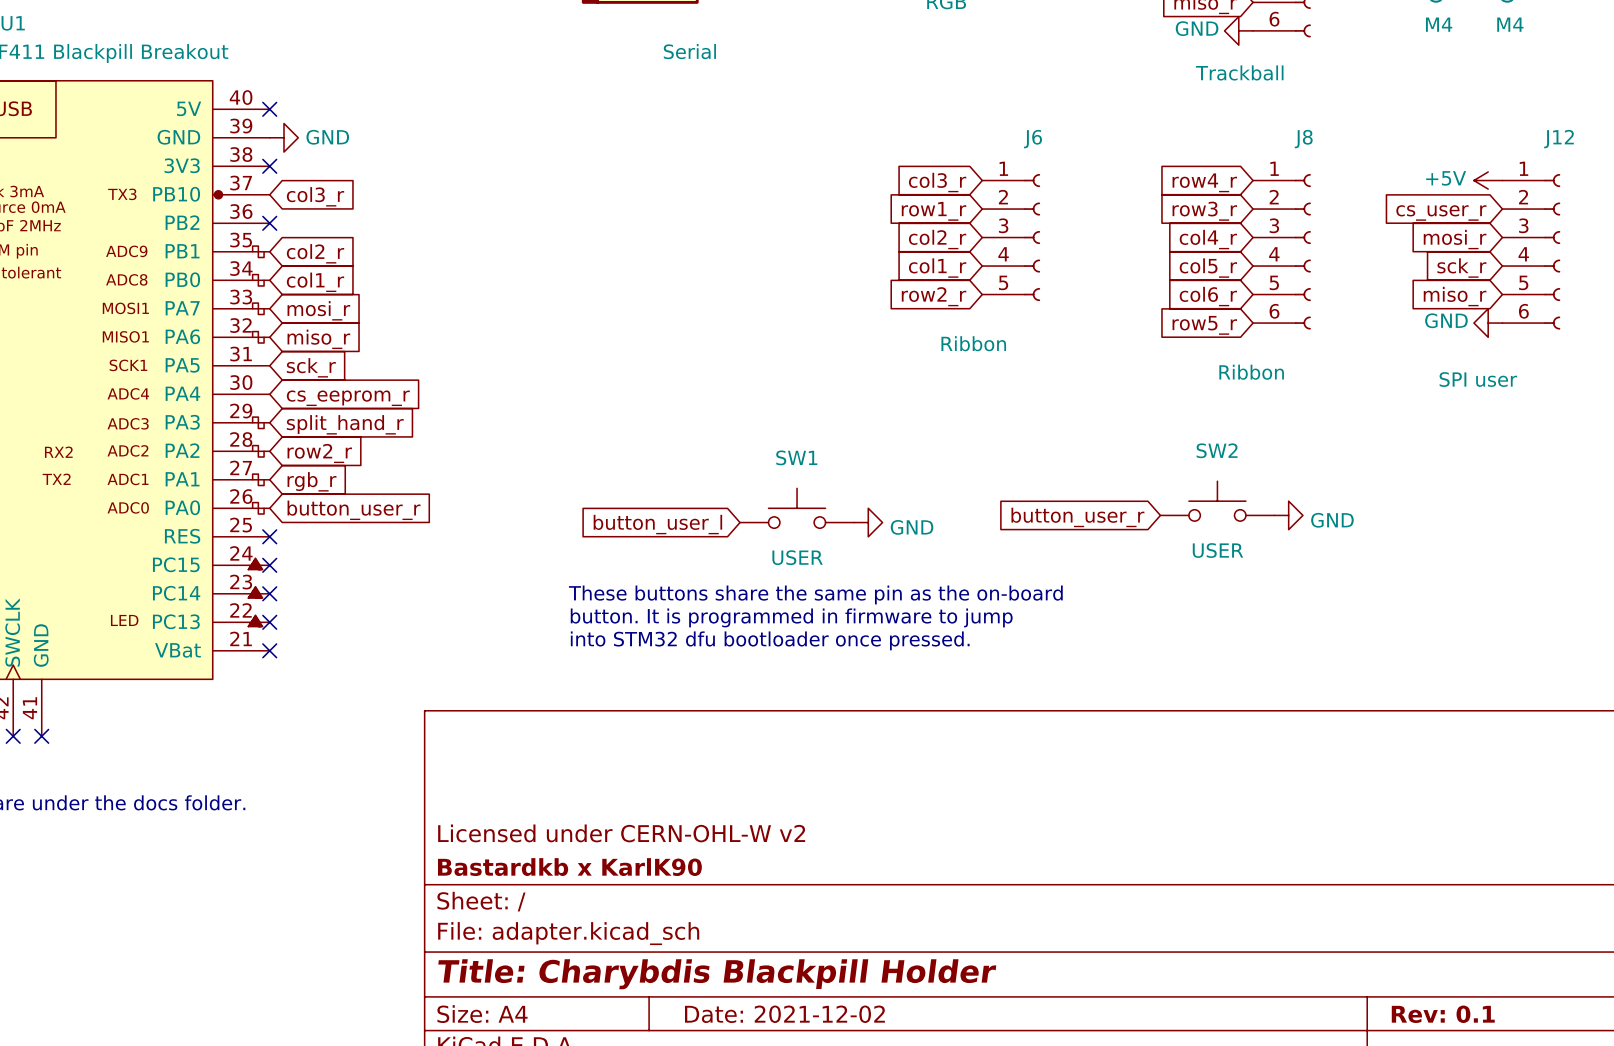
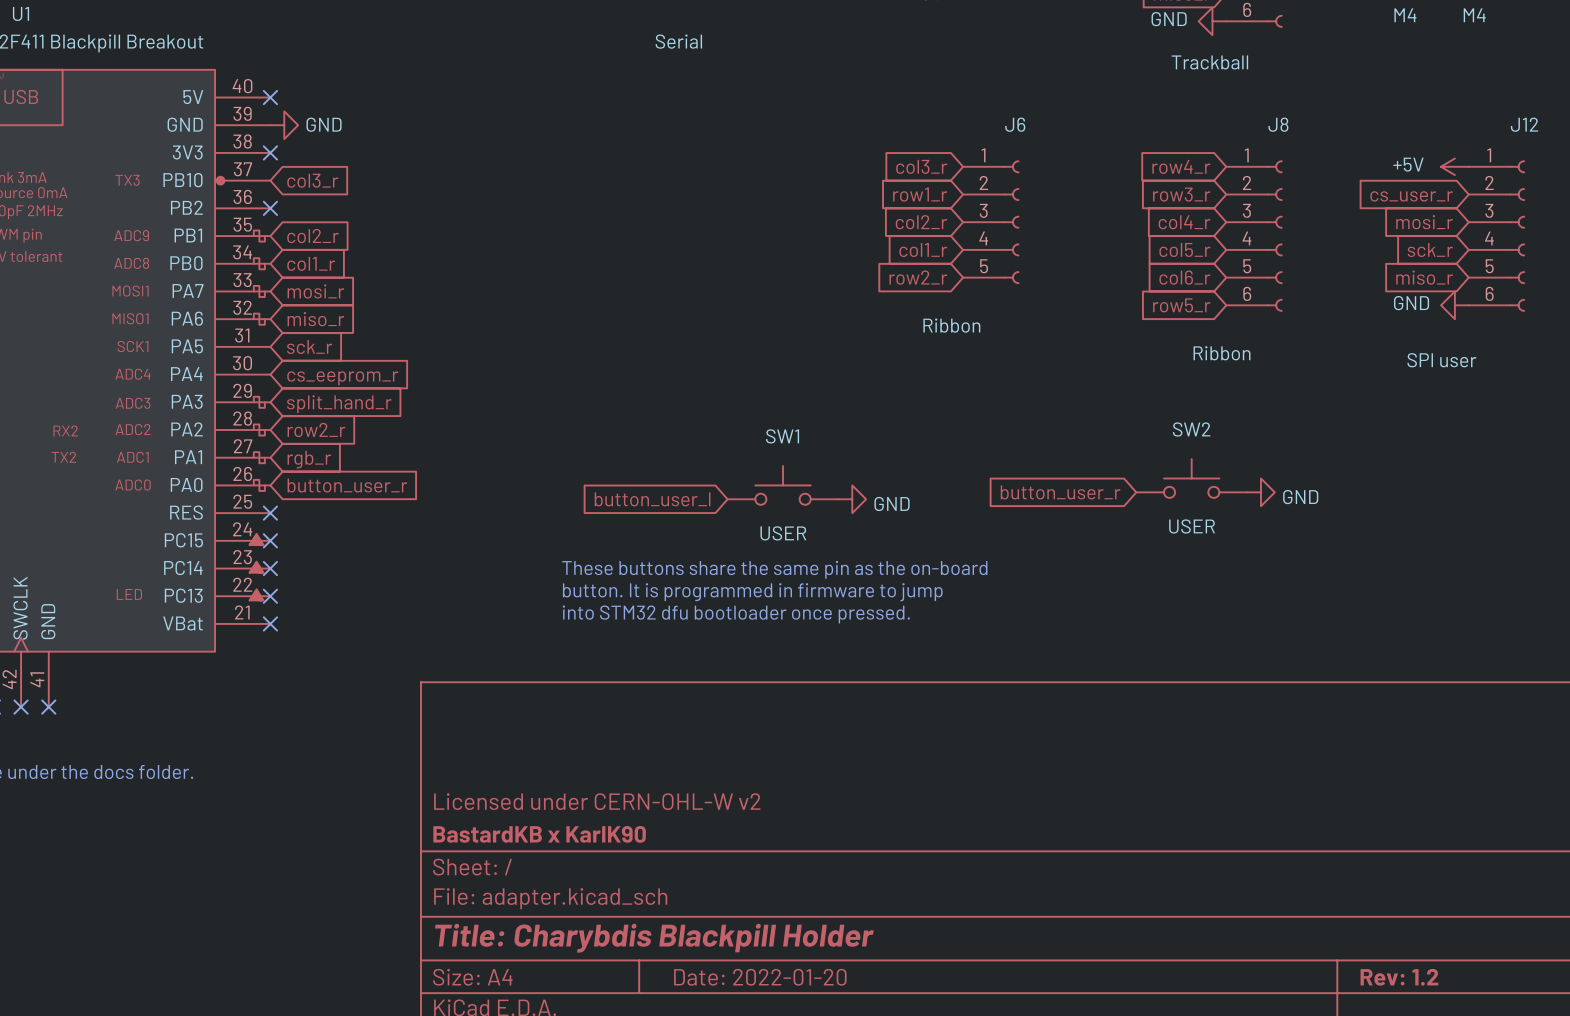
title block: Bastardkb x KarlK90 (569, 867) -> BastardKB x KarlK90 (539, 834)
title block: Date: 2021-12-02 (784, 1014) -> Date: 2022-01-20 (760, 977)
title block: Rev: 0.1 (1443, 1014) -> Rev: 1.2 (1399, 977)

